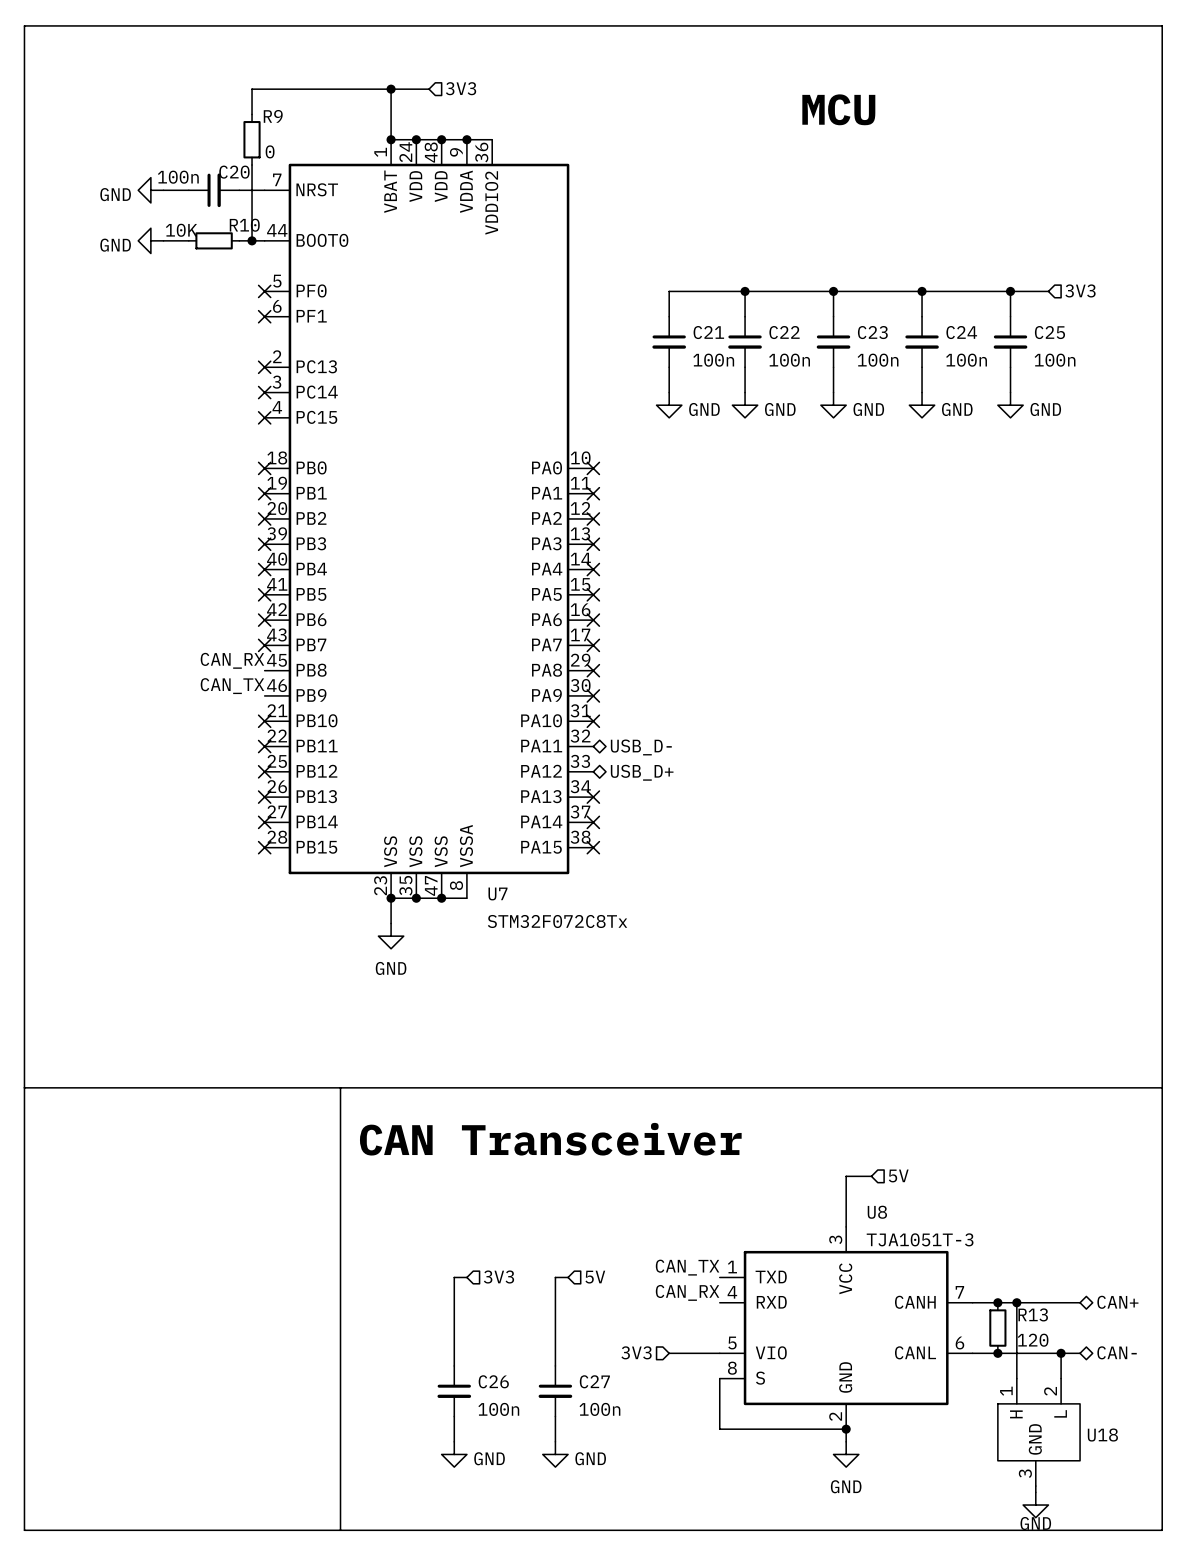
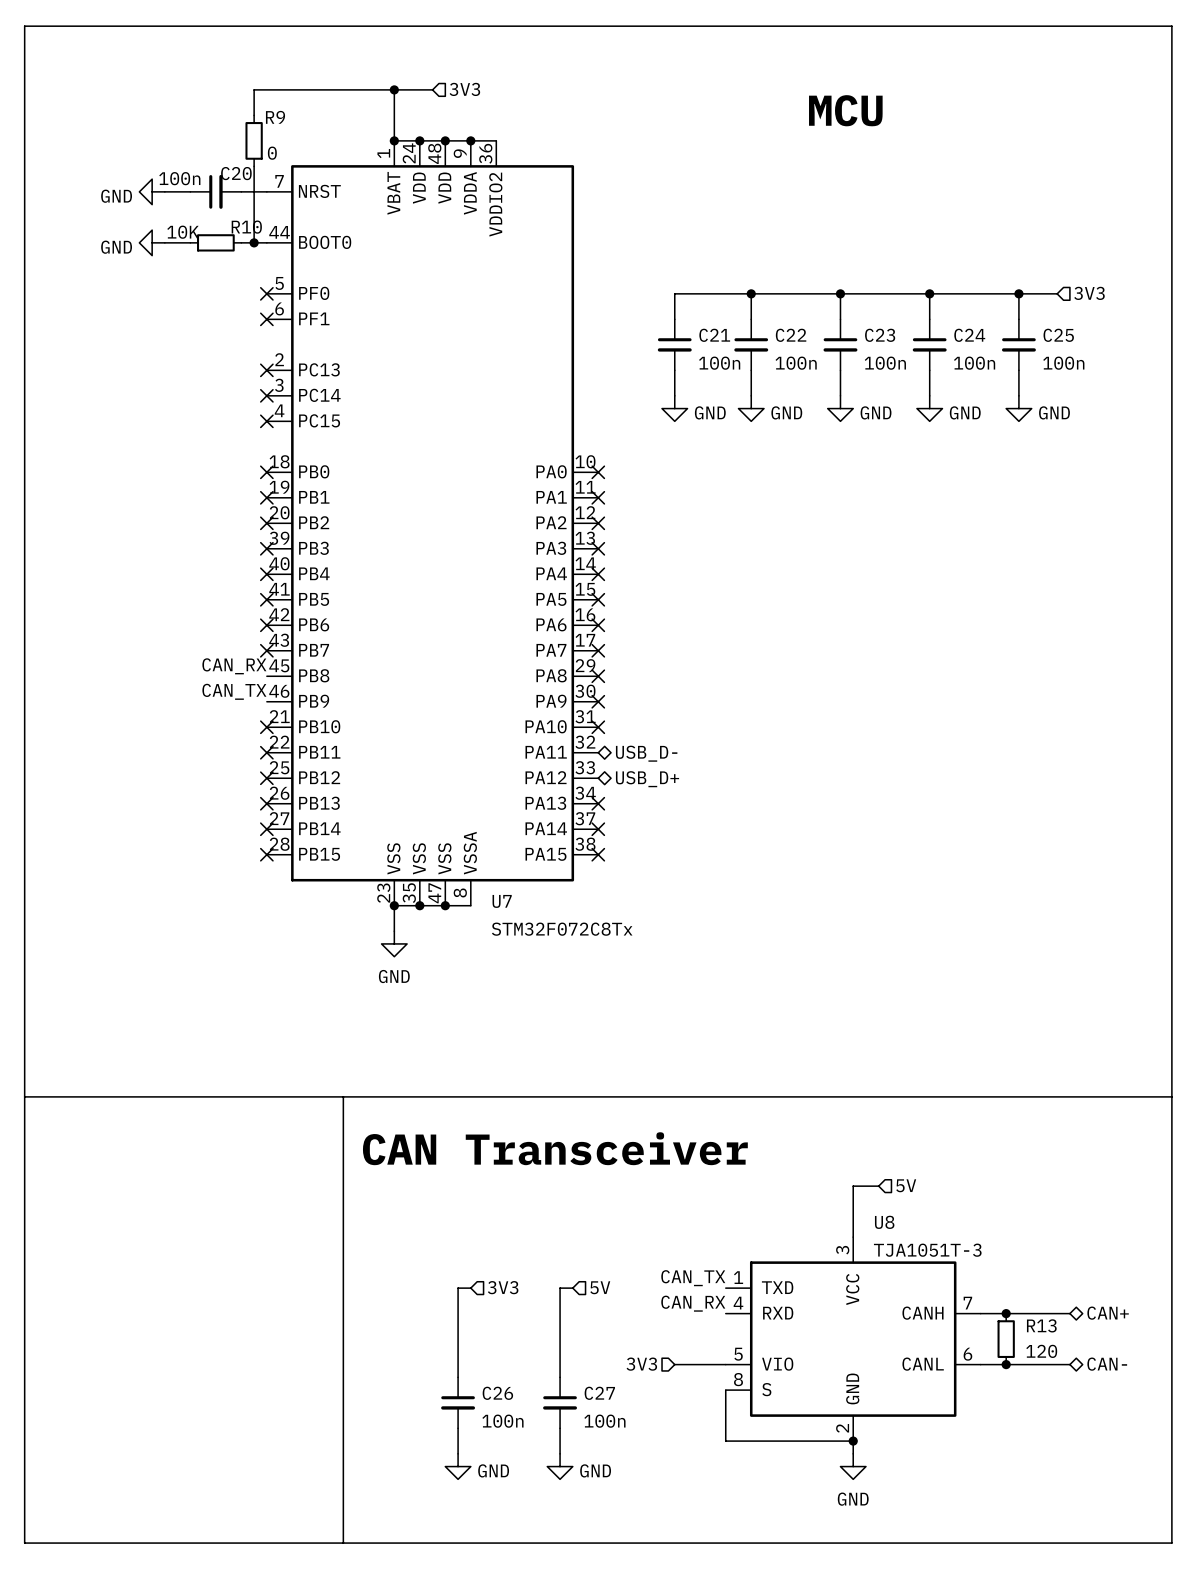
wire: (1016, 1302) (1016, 1378) -> none
junction: (1016, 1302) -> none
wire: (1061, 1302) (1080, 1302) -> none
hierarchical label position: CAN+ (1117, 1302) -> CAN+ (1108, 1313)
hierarchical label position: CAN- (1117, 1352) -> CAN- (1107, 1364)
junction: (1061, 1353) -> none
wire: (1080, 1353) (1061, 1353) (1061, 1378) -> none
U18: (1038, 1432) -> none
wire: (1035, 1486) (1035, 1492) -> none
power symbol: GND (1035, 1505) -> none

